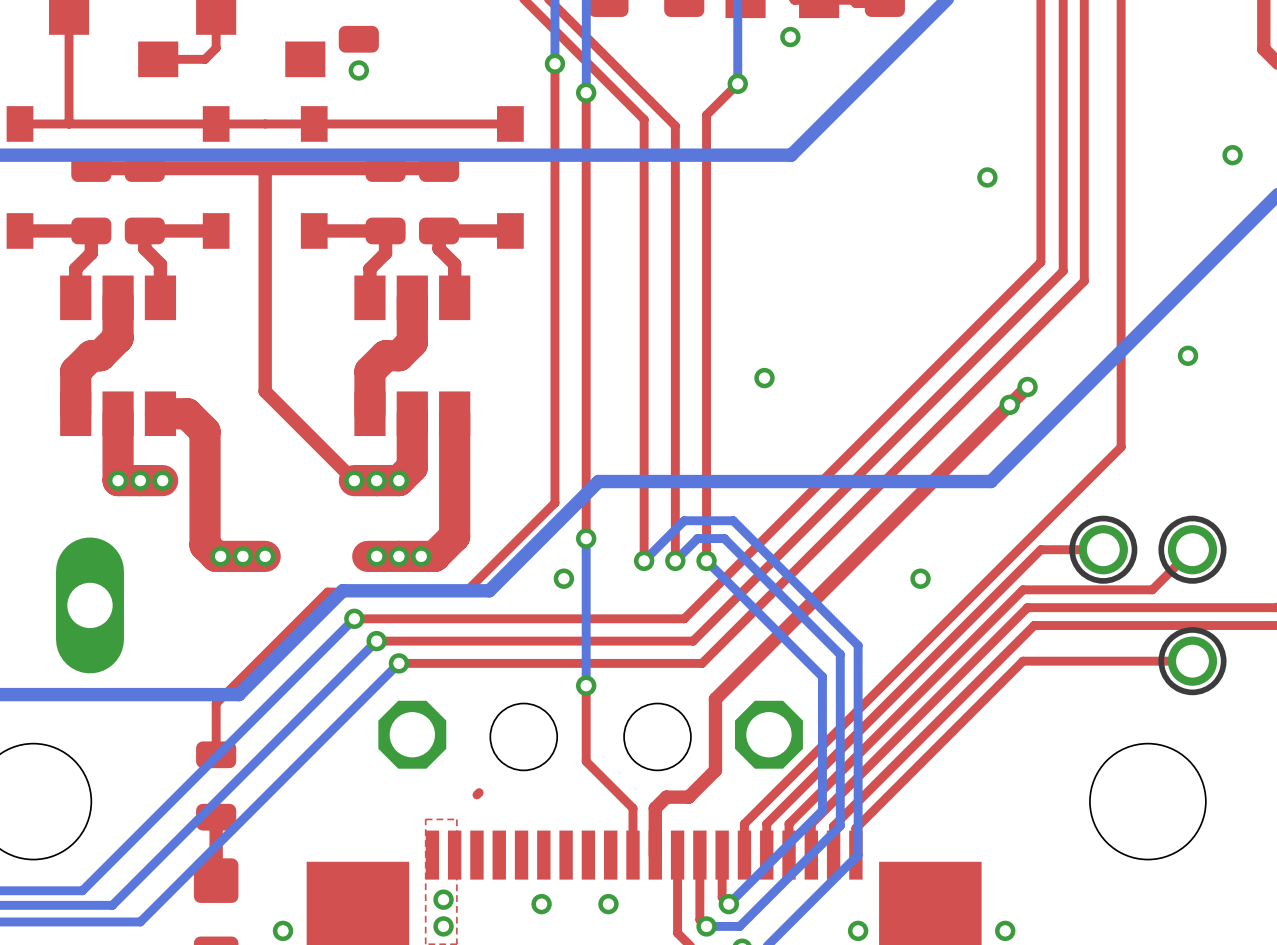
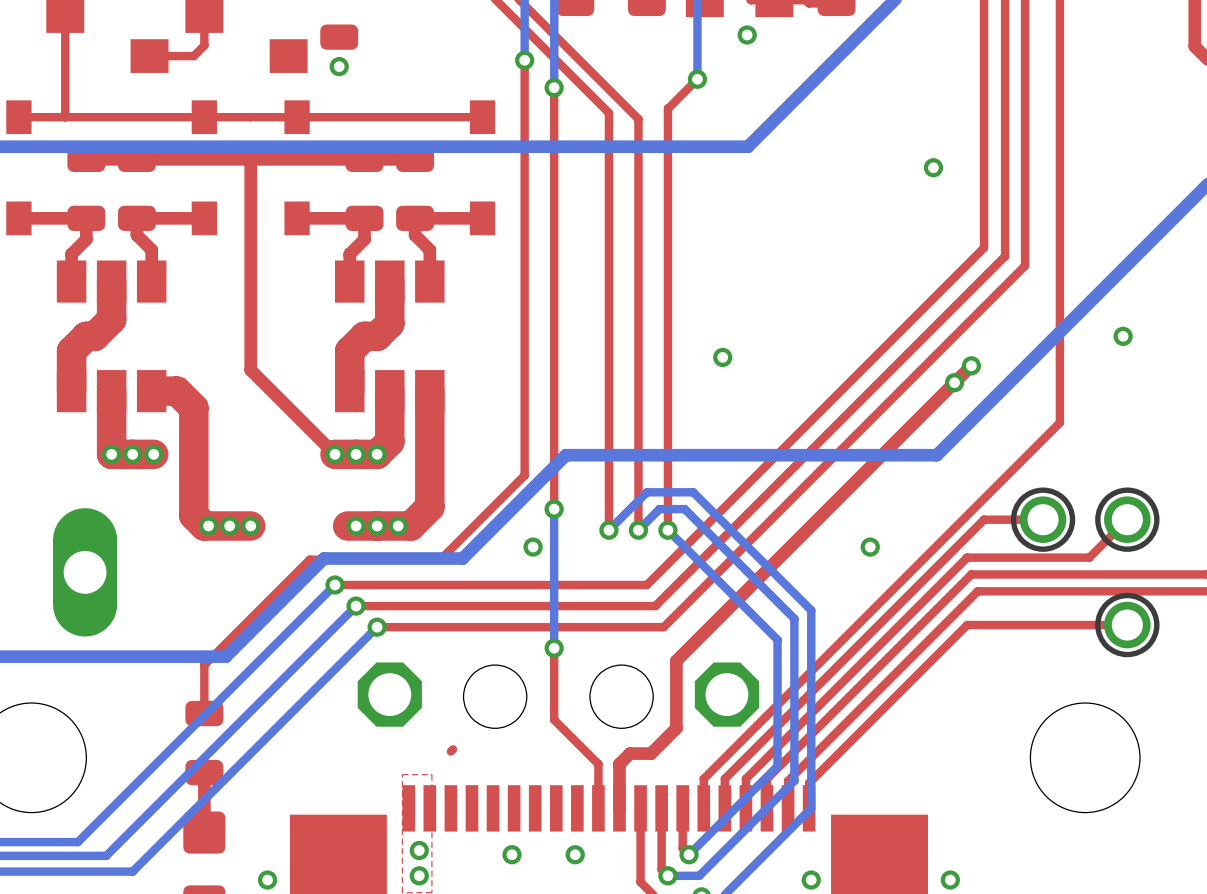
via: (1232, 155) -> none

